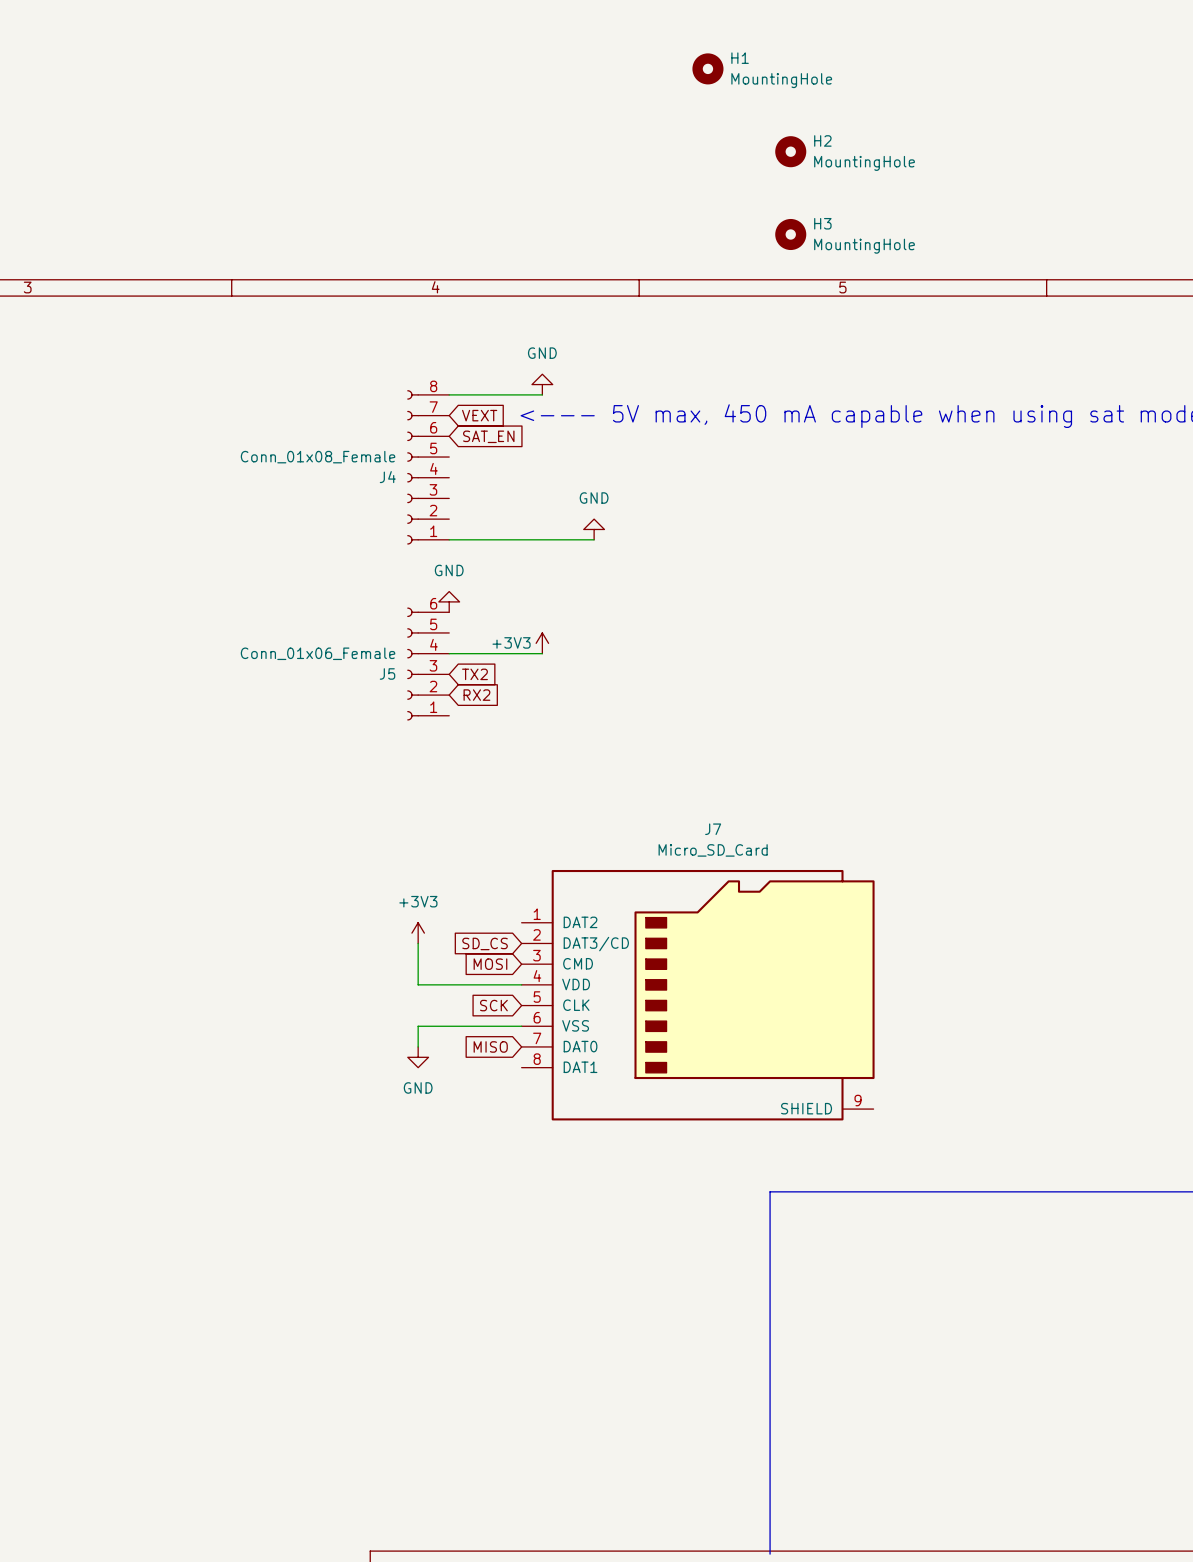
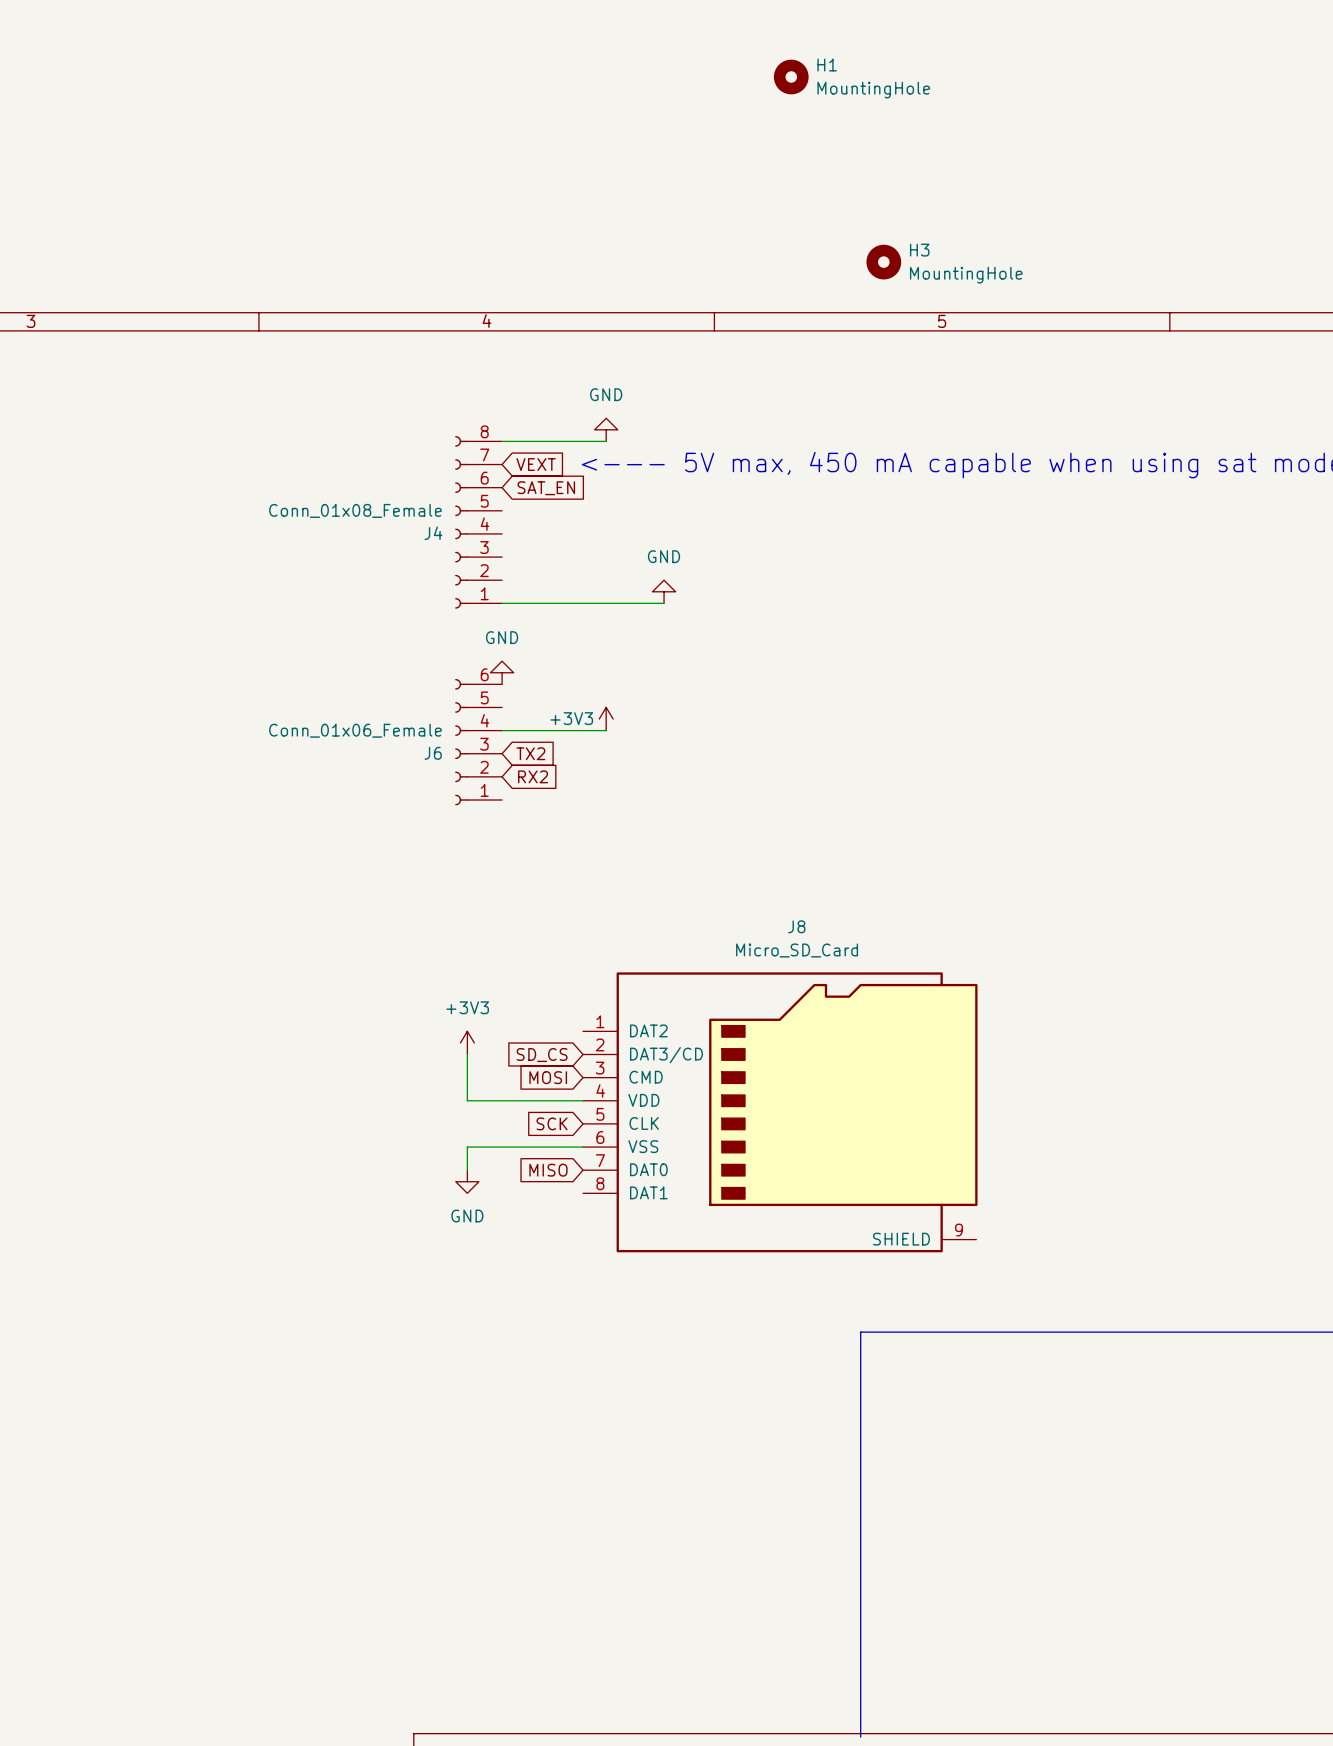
H2: MountingHole (790, 151) -> none
J5 name: J5 (387, 673) -> J6 (433, 753)
J7 name: J7 (713, 829) -> J8 (796, 926)

